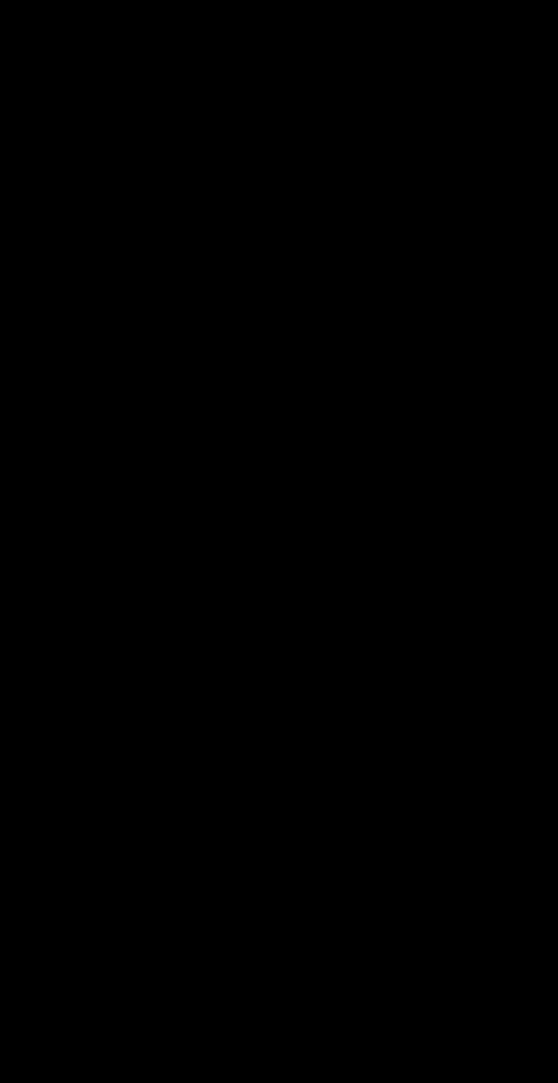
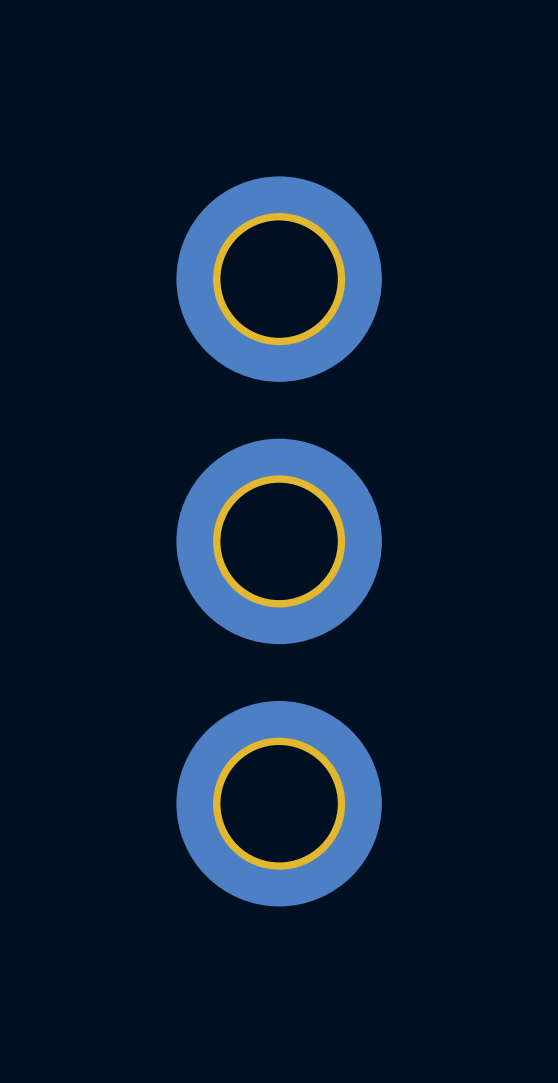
part: none -> (279, 279)
part: none -> (279, 541)
part: none -> (279, 803)

